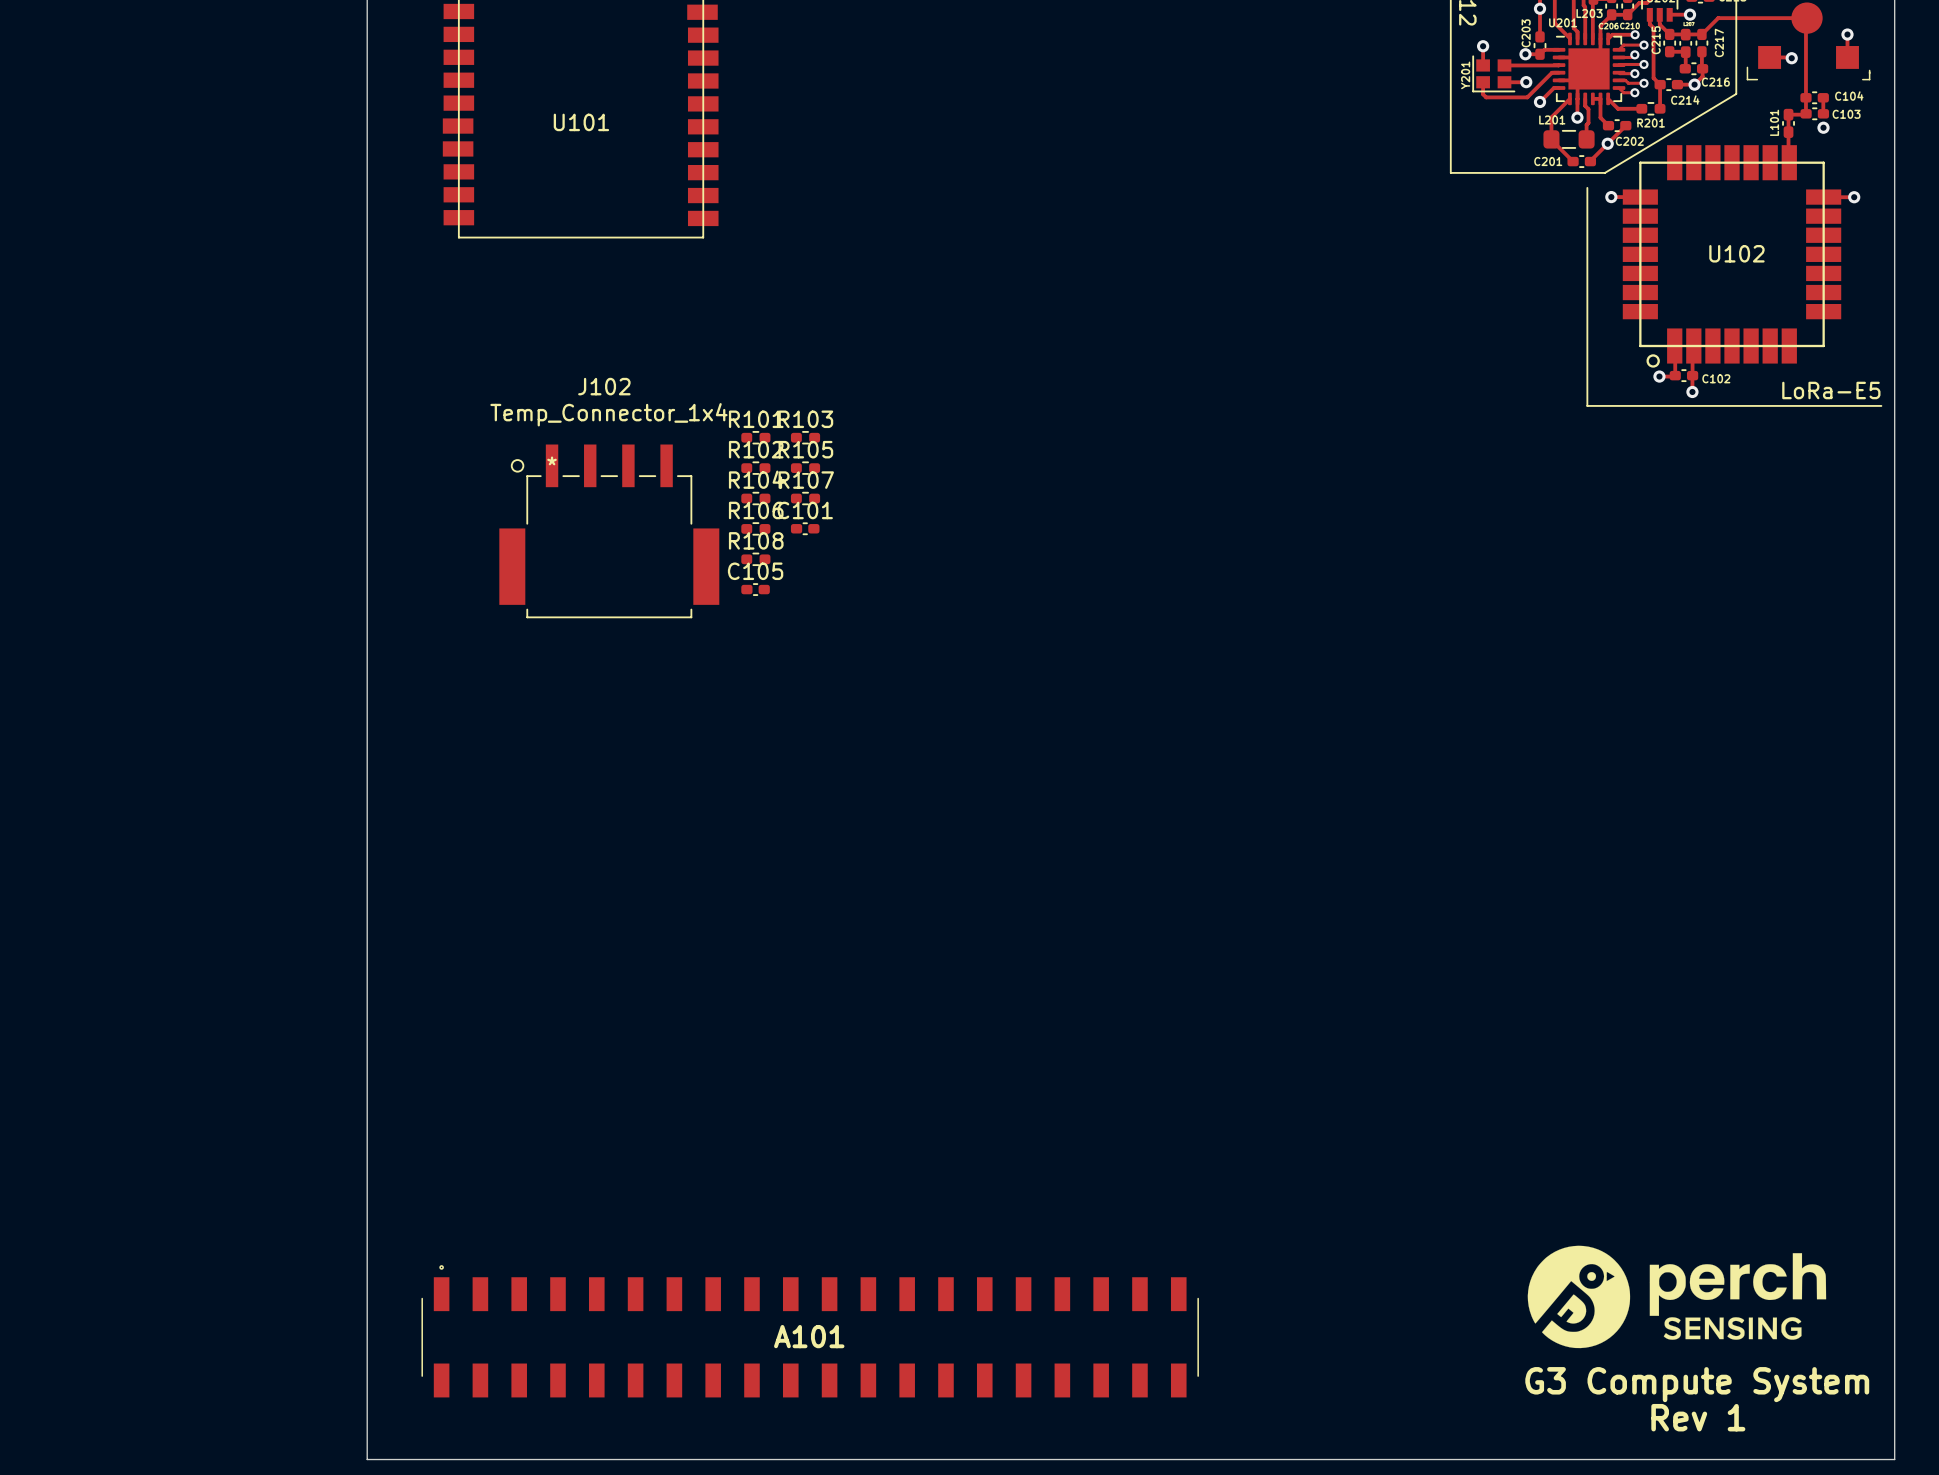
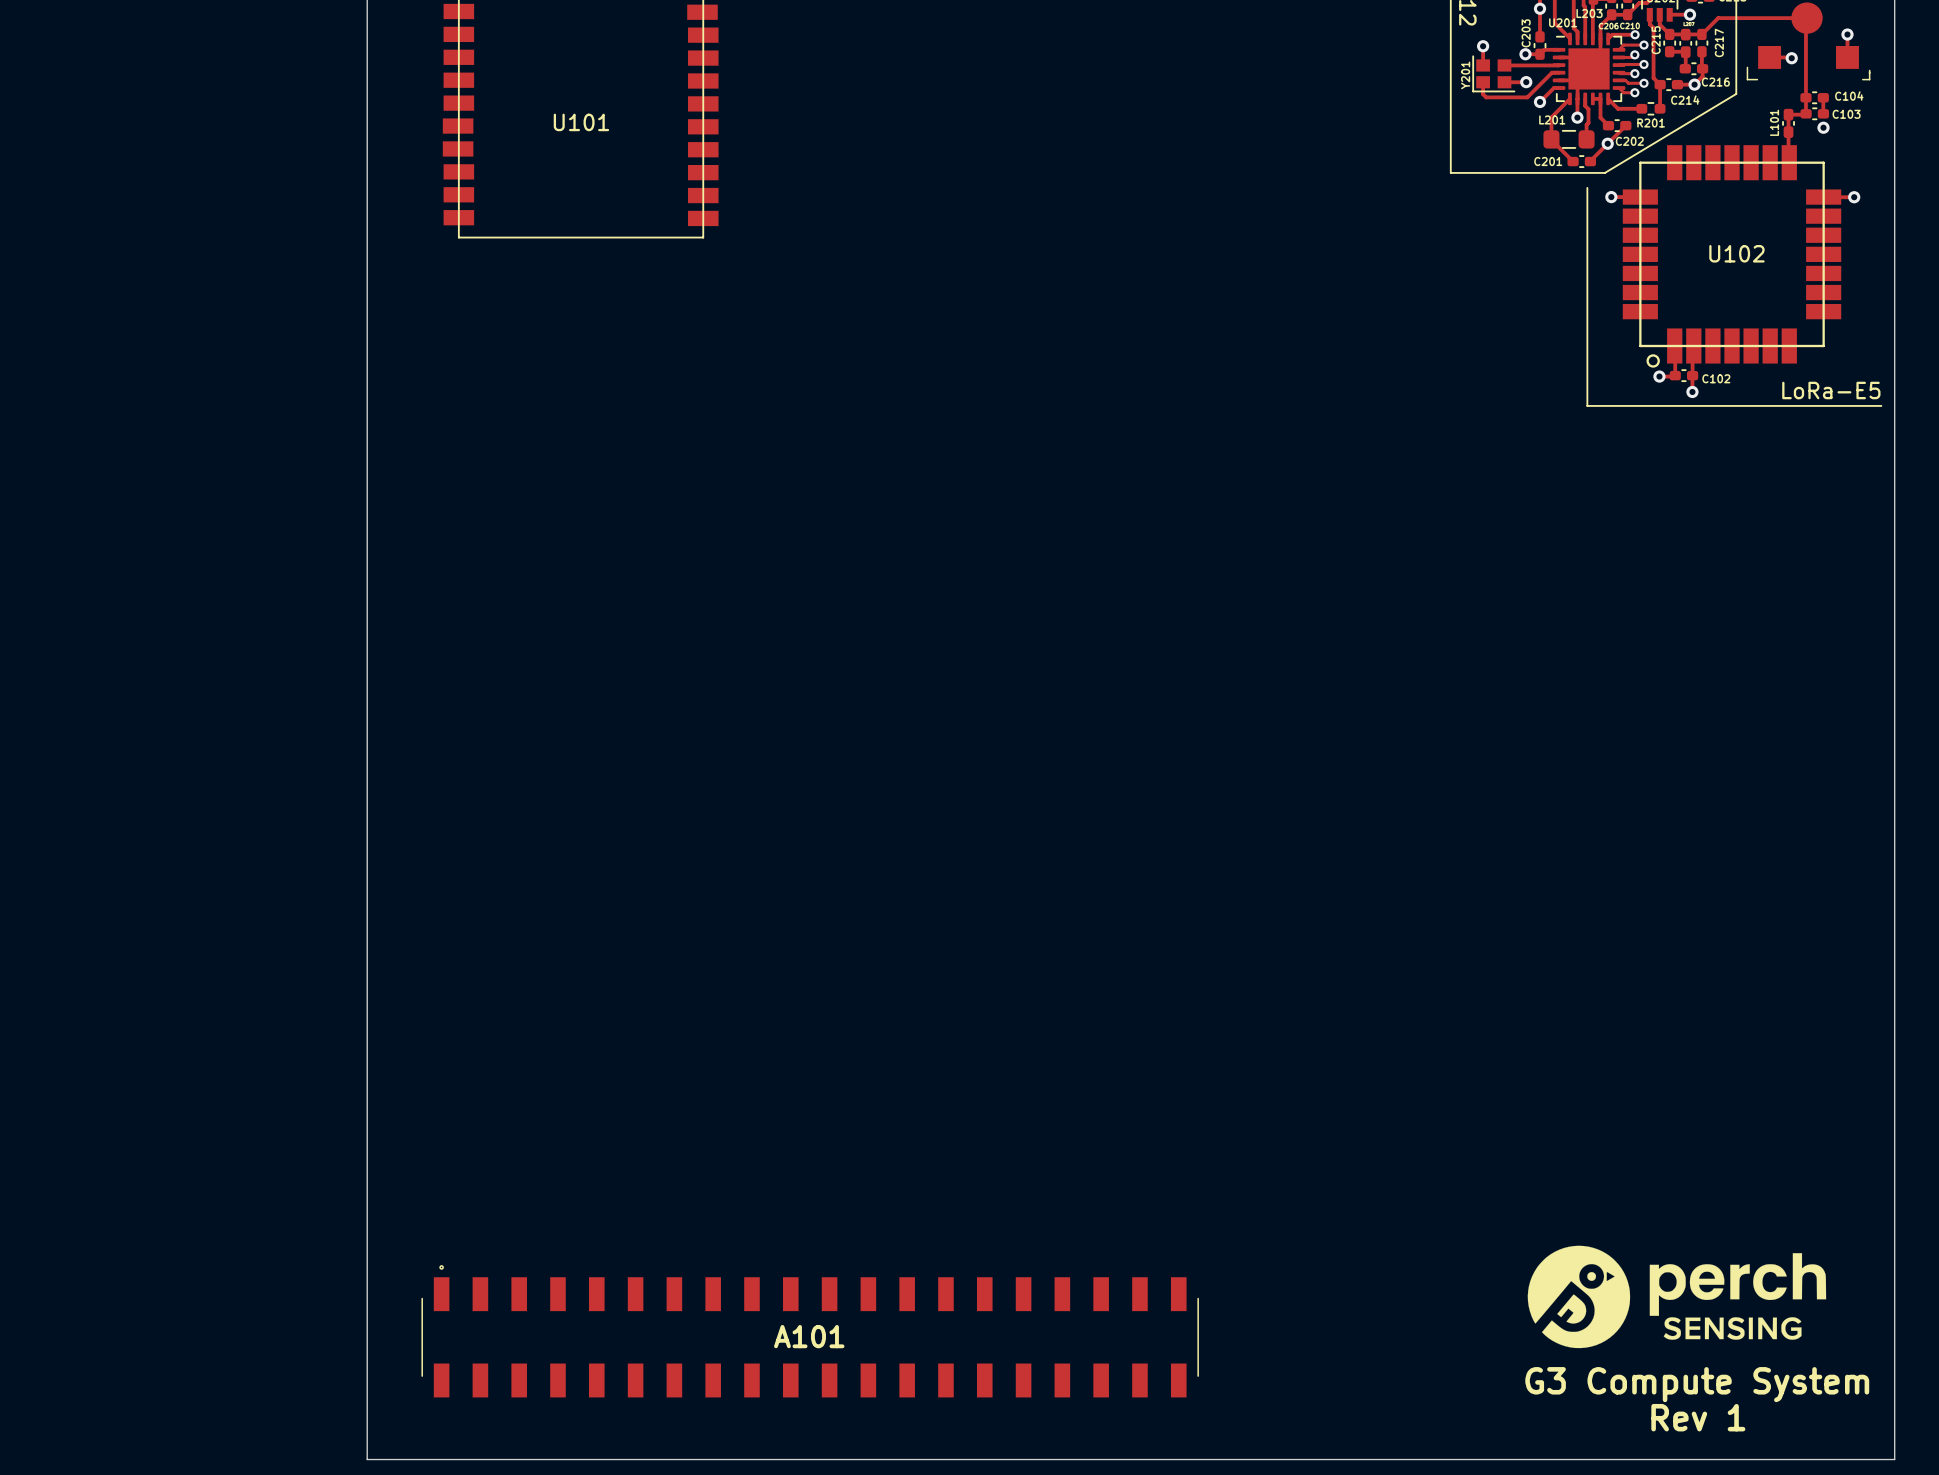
R101: (755, 437) -> none
R103: (805, 437) -> none
R102: (755, 468) -> none
R105: (805, 468) -> none
R104: (755, 498) -> none
R107: (805, 498) -> none
R106: (755, 528) -> none
C101: (805, 528) -> none
J102: Temp_Connector_1x4 (609, 531) -> none
R108: (755, 559) -> none
C105: (755, 589) -> none

